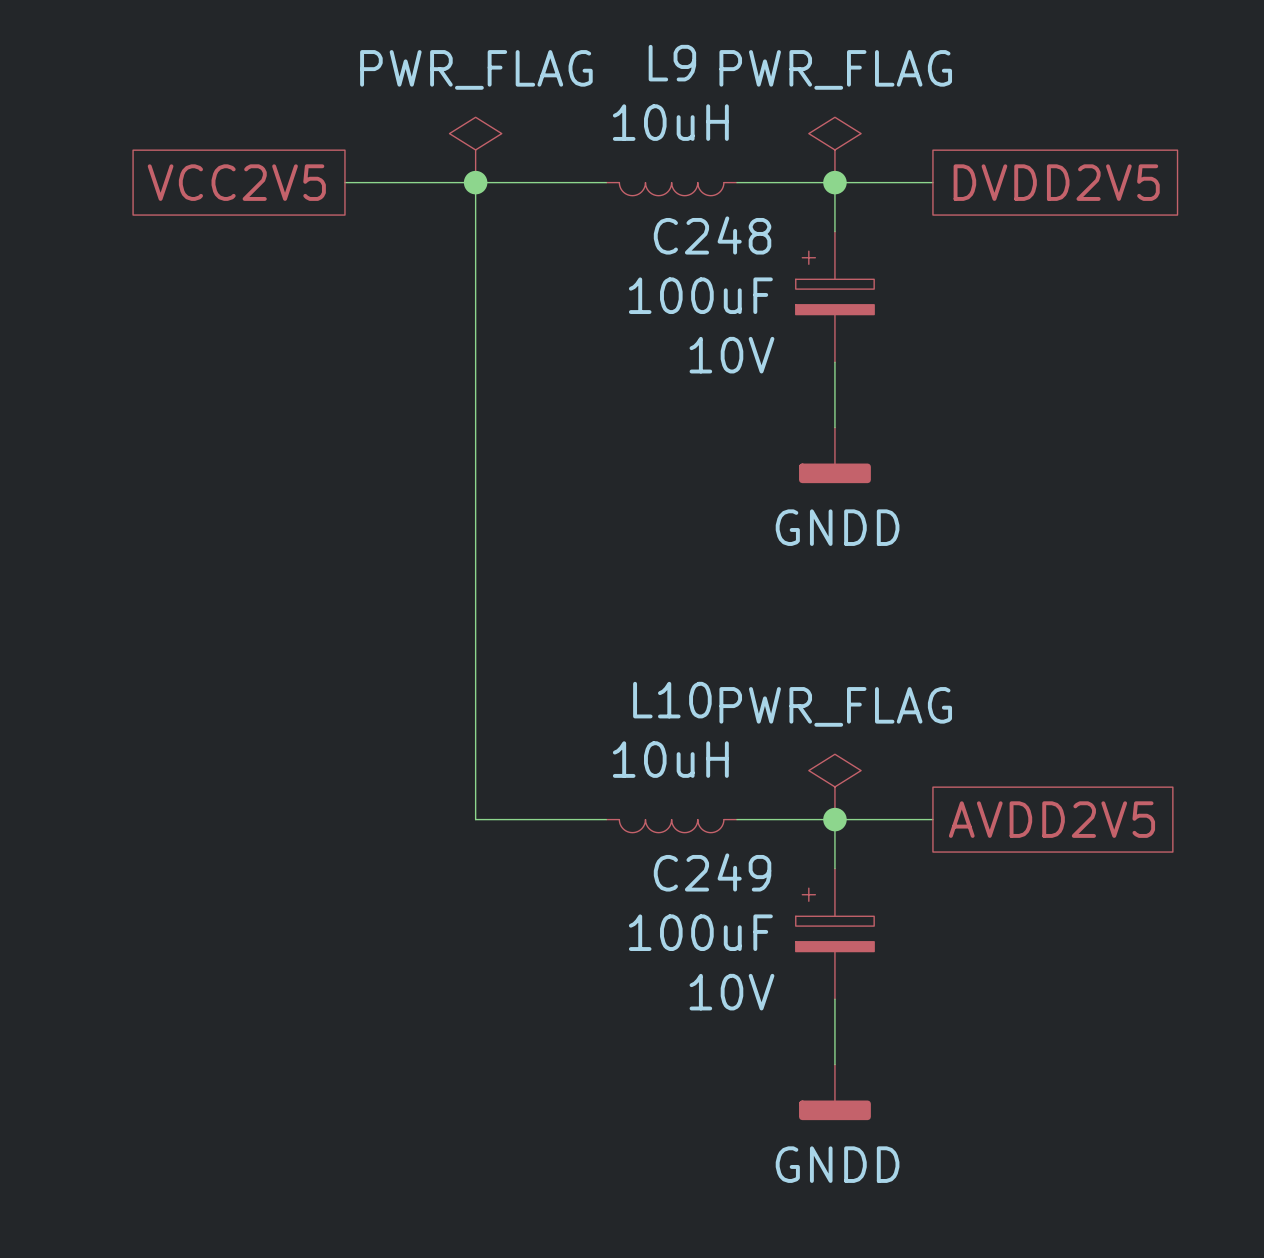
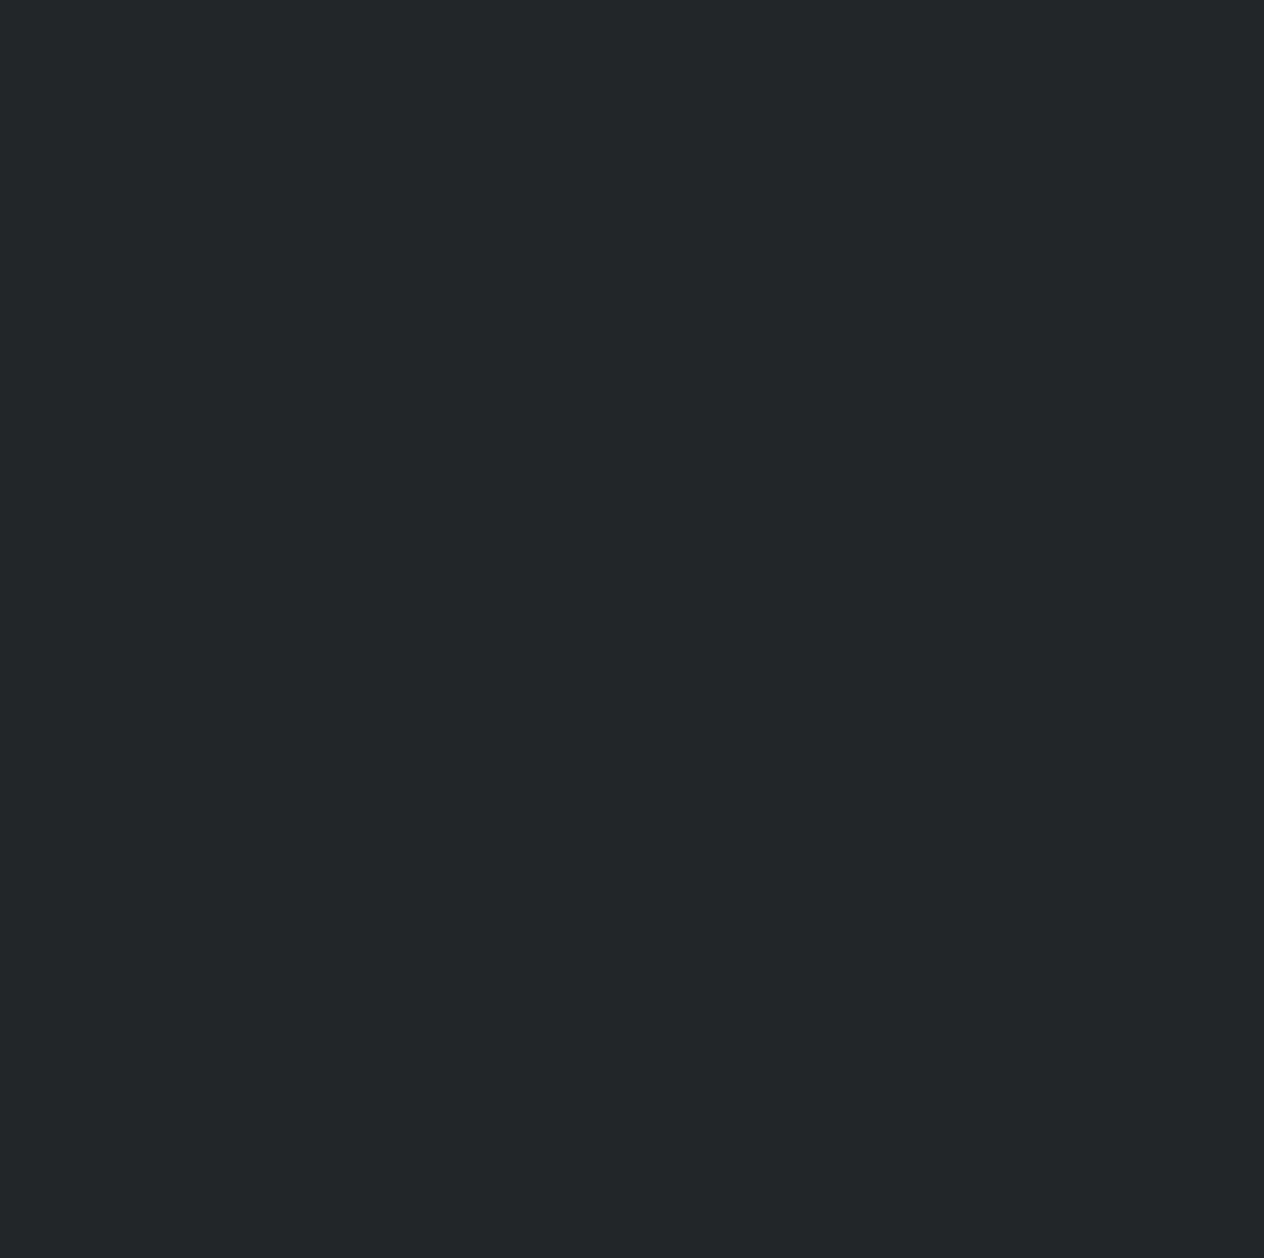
power symbol: PWR_FLAG (475, 149) -> none
power symbol: PWR_FLAG (834, 149) -> none
global label: VCC2V5 (236, 182) -> none
wire: (344, 182) (606, 182) -> none
wire: (475, 182) (475, 819) (606, 819) -> none
junction: (475, 182) -> none
wire: (736, 182) (932, 182) -> none
wire: (834, 182) (834, 231) -> none
junction: (834, 182) -> none
global label: DVDD2V5 (1056, 182) -> none
L9: 10uH (671, 189) -> none
C248: 100uF (834, 296) -> none
wire: (834, 362) (834, 427) -> none
power symbol: GNDD (834, 455) -> none
power symbol: PWR_FLAG (834, 786) -> none
wire: (736, 819) (932, 819) -> none
wire: (834, 819) (834, 868) -> none
junction: (834, 819) -> none
global label: AVDD2V5 (1052, 819) -> none
L10: 10uH (671, 826) -> none
C249: 100uF (834, 933) -> none
wire: (834, 999) (834, 1064) -> none
power symbol: GNDD (834, 1092) -> none

